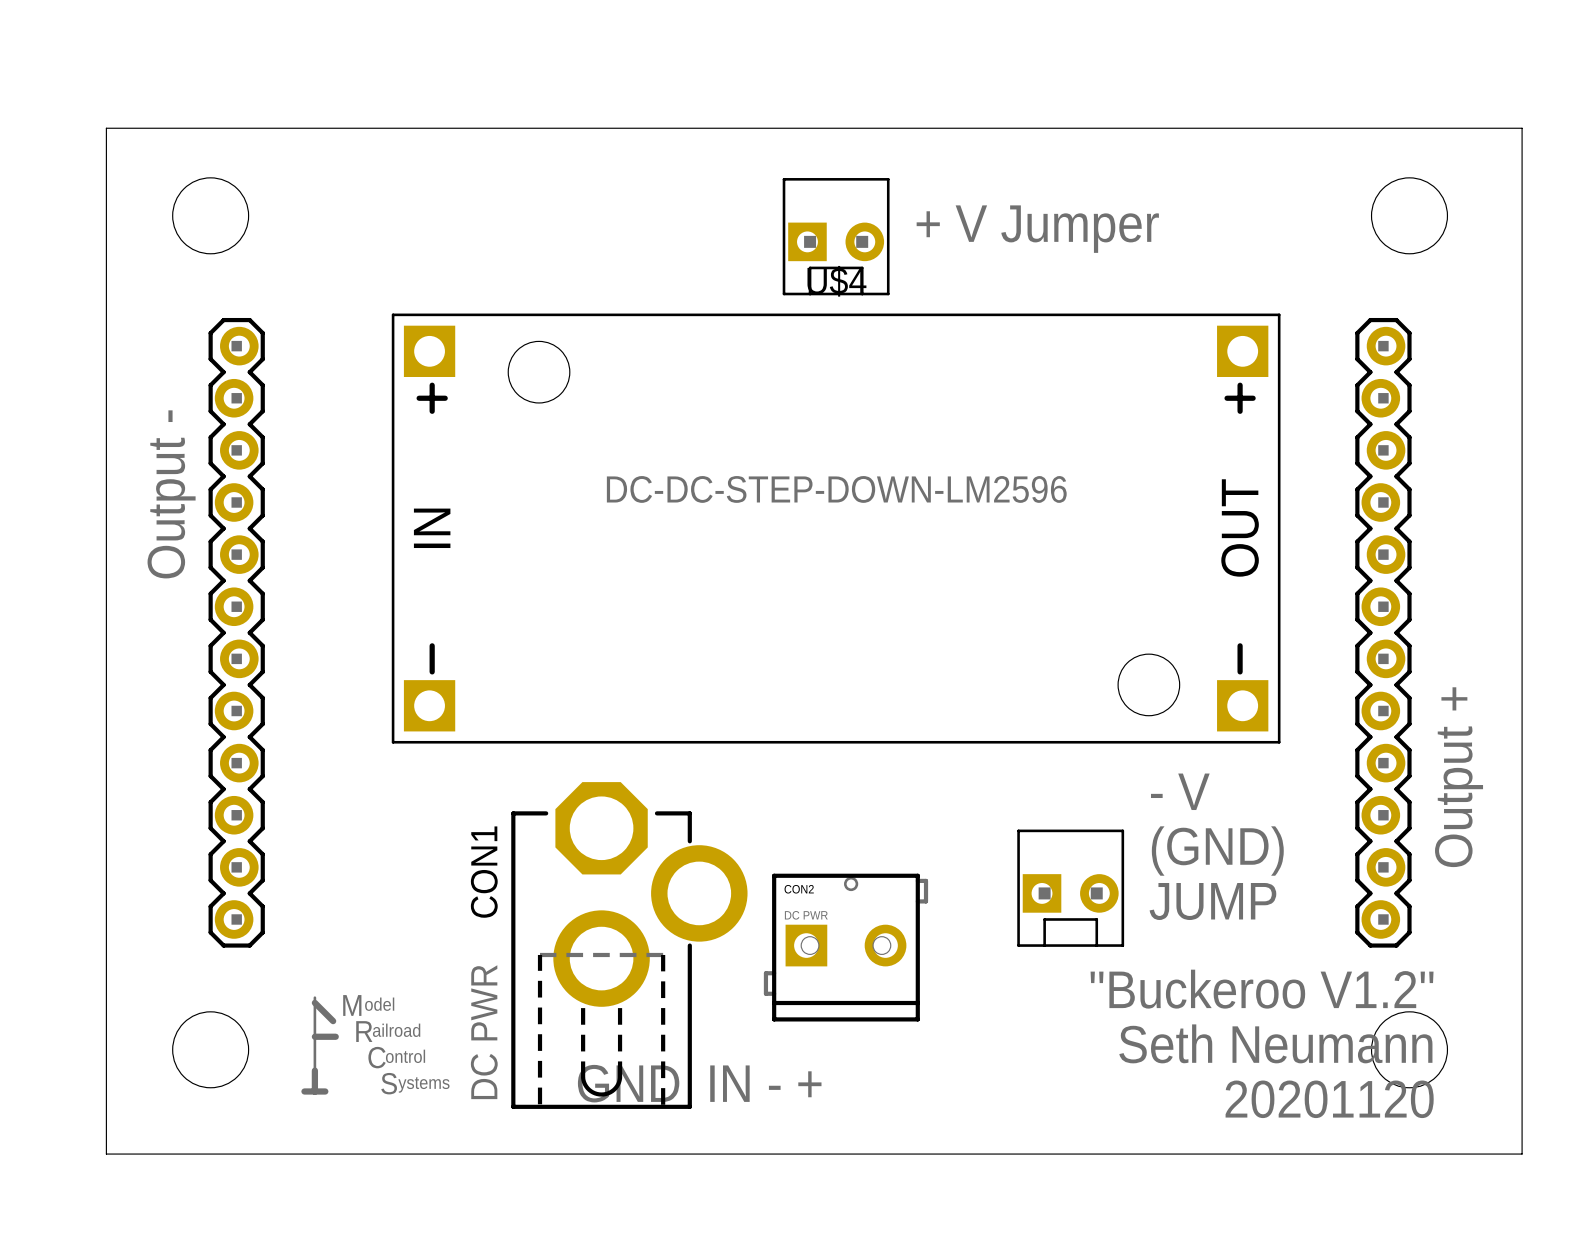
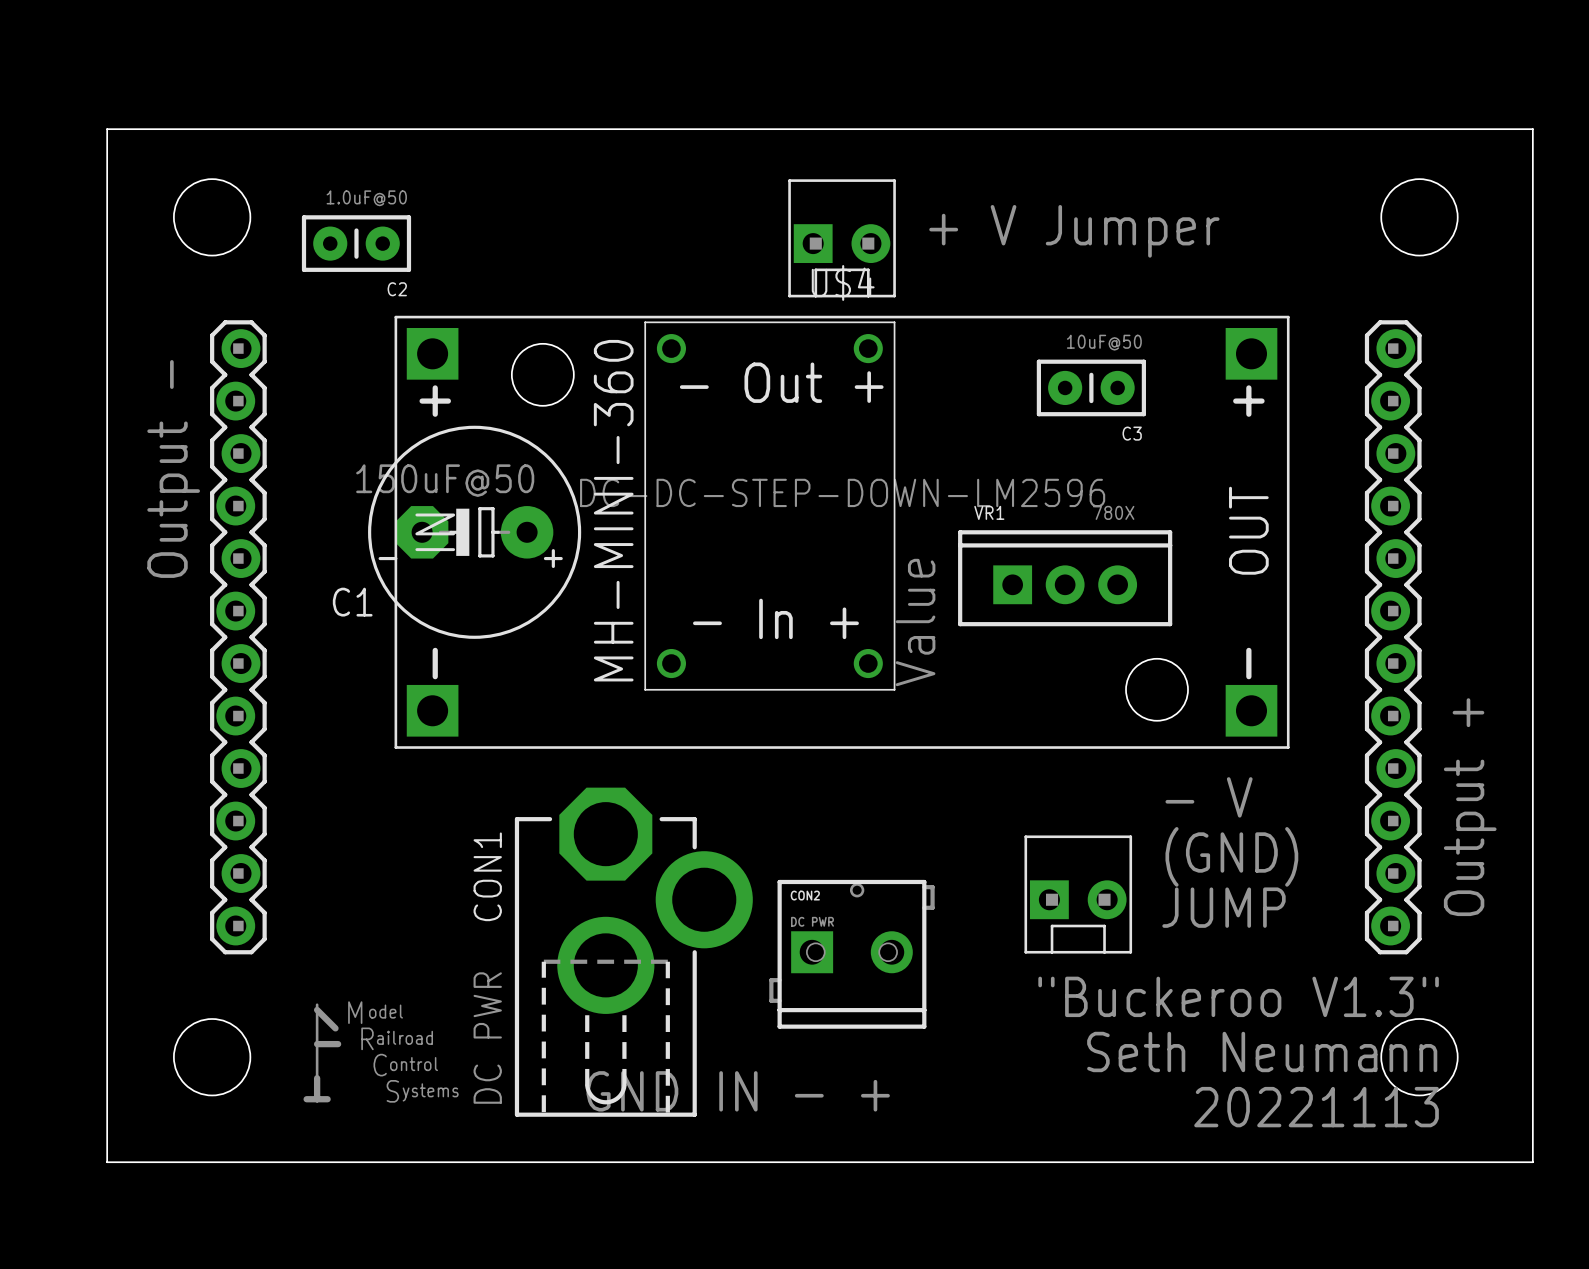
C2: none -> 1.0uF@50 (356, 243)
text: none -> - Out + (781, 382)
C3: none -> 10uF@50 (1091, 387)
MH-MINI-360: none -> (769, 506)
C1: none -> 150uF@50 (474, 532)
VR1: none -> 780X (1065, 578)
text: none -> - In + (775, 618)
text: "Buckeroo V1.2" (1262, 989) -> "Buckeroo V1.3" (1238, 996)
text: 20201120 (1329, 1099) -> 20221113 (1316, 1107)

